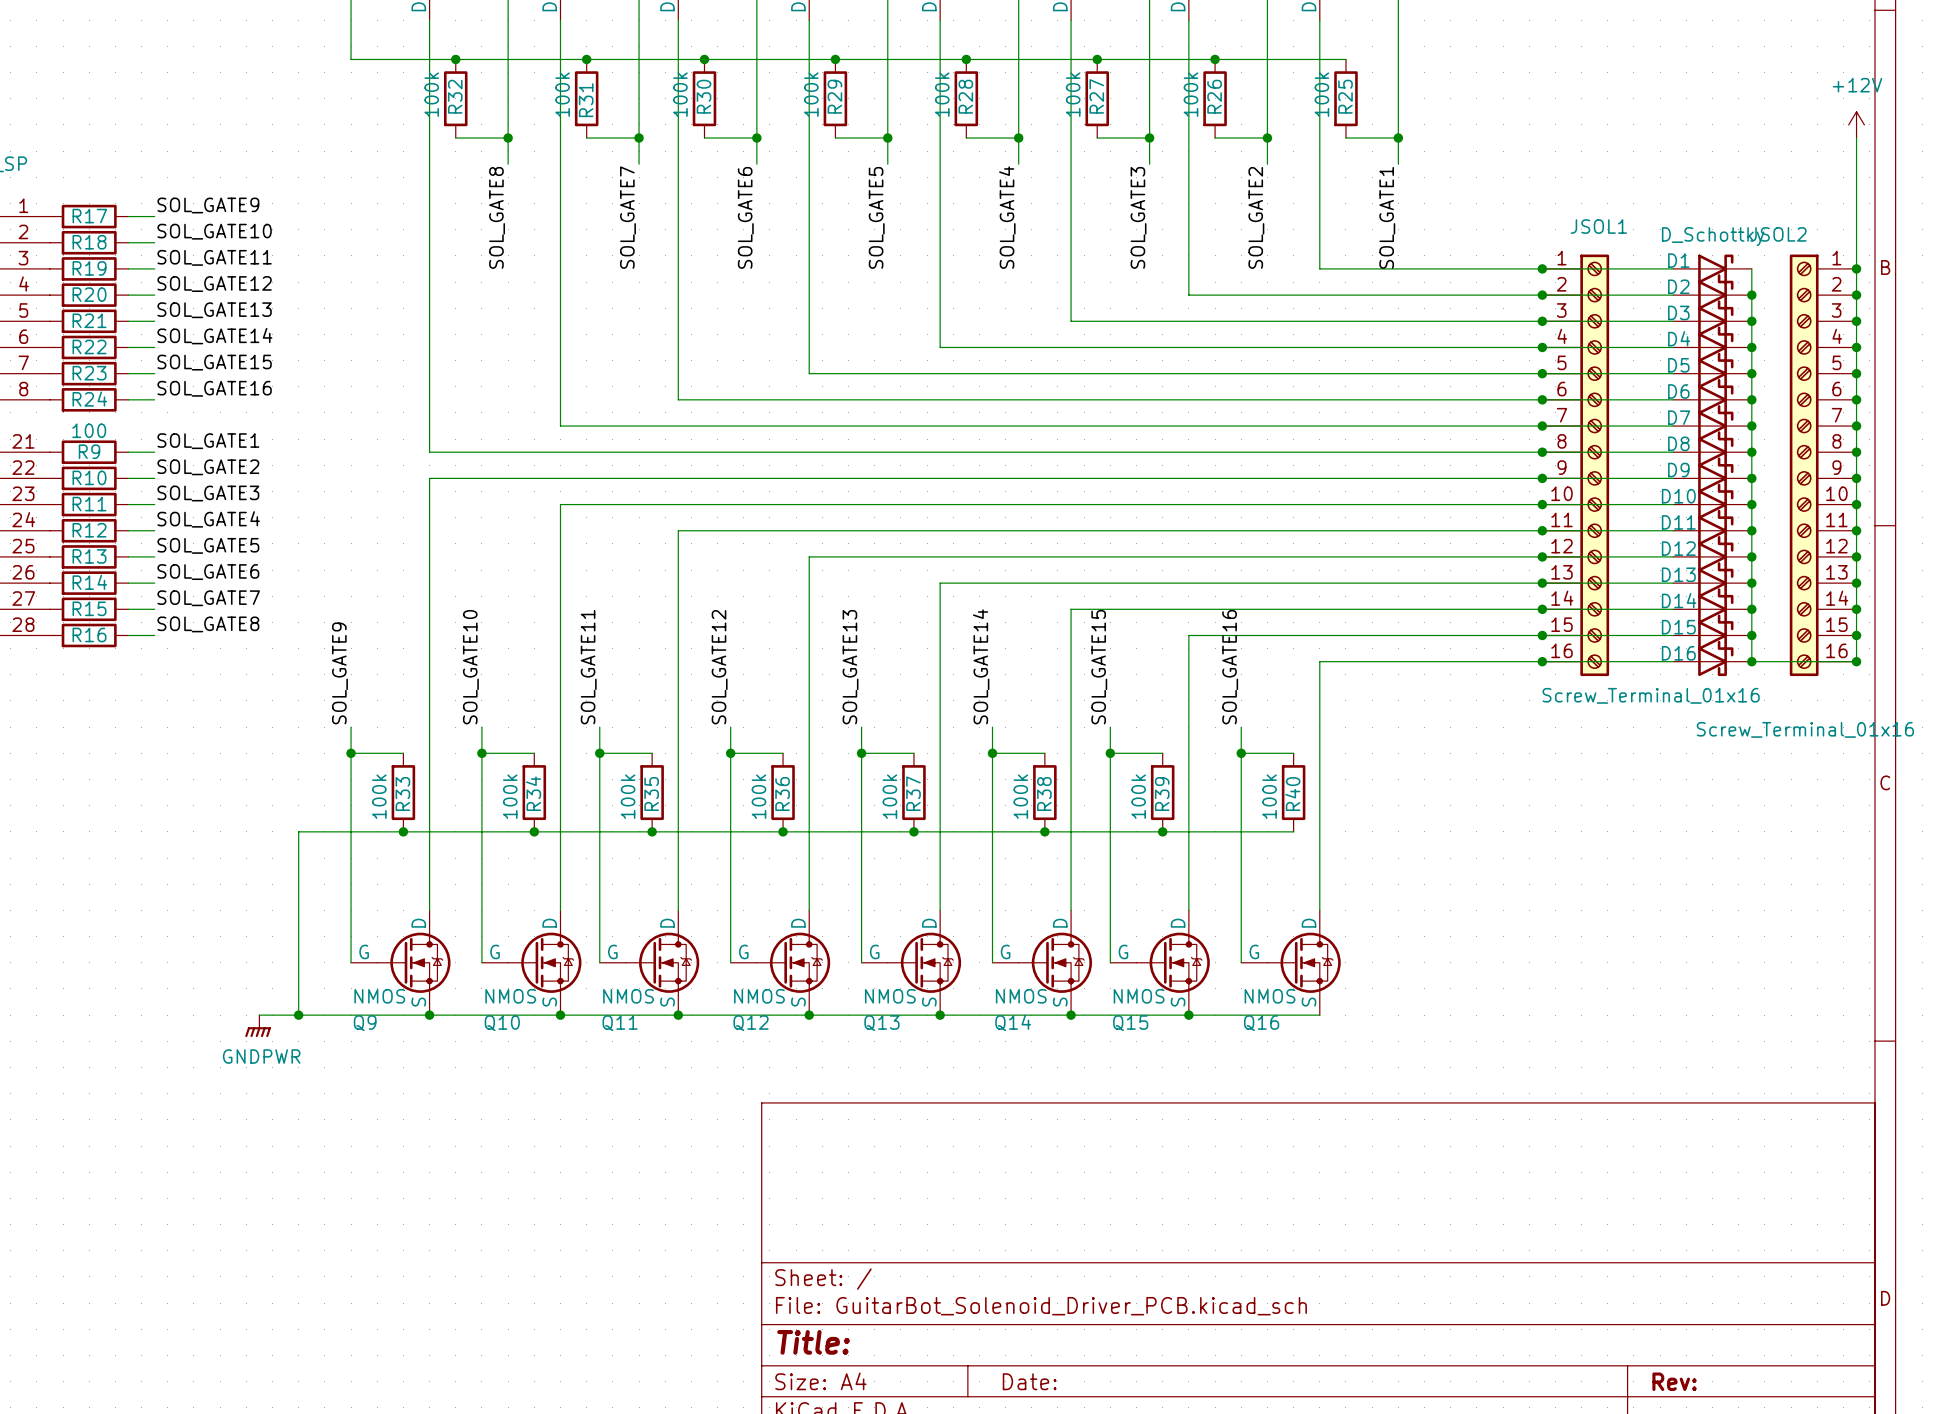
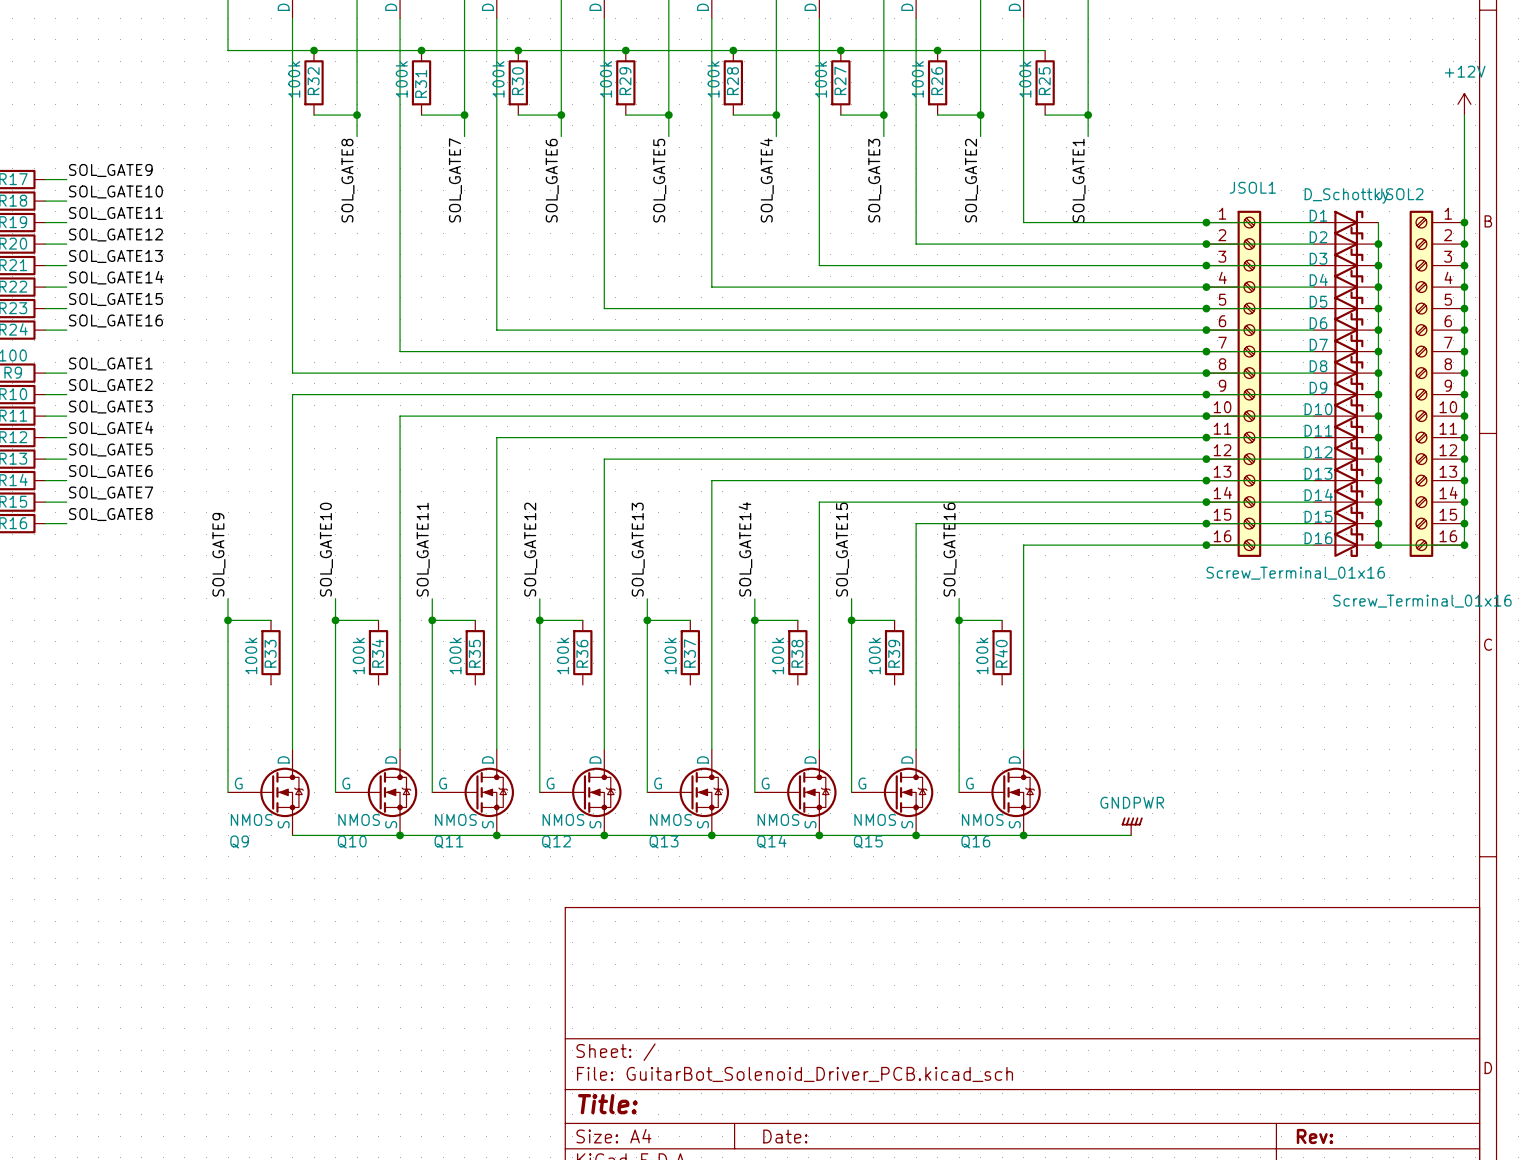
junction: (403, 831) -> none
junction: (534, 831) -> none
junction: (652, 831) -> none
junction: (783, 831) -> none
junction: (913, 831) -> none
junction: (1044, 831) -> none
junction: (1162, 831) -> none
wire: (1293, 831) (298, 831) (298, 1015) -> none
power symbol: none -> GNDPWR (1132, 826)
wire: (259, 1015) (429, 1015) -> none
junction: (298, 1015) -> none
junction: (429, 1015) -> none
wire: none -> (1023, 835) (1131, 835)
junction: none -> (1023, 835)
power symbol: GNDPWR (258, 1026) -> none

